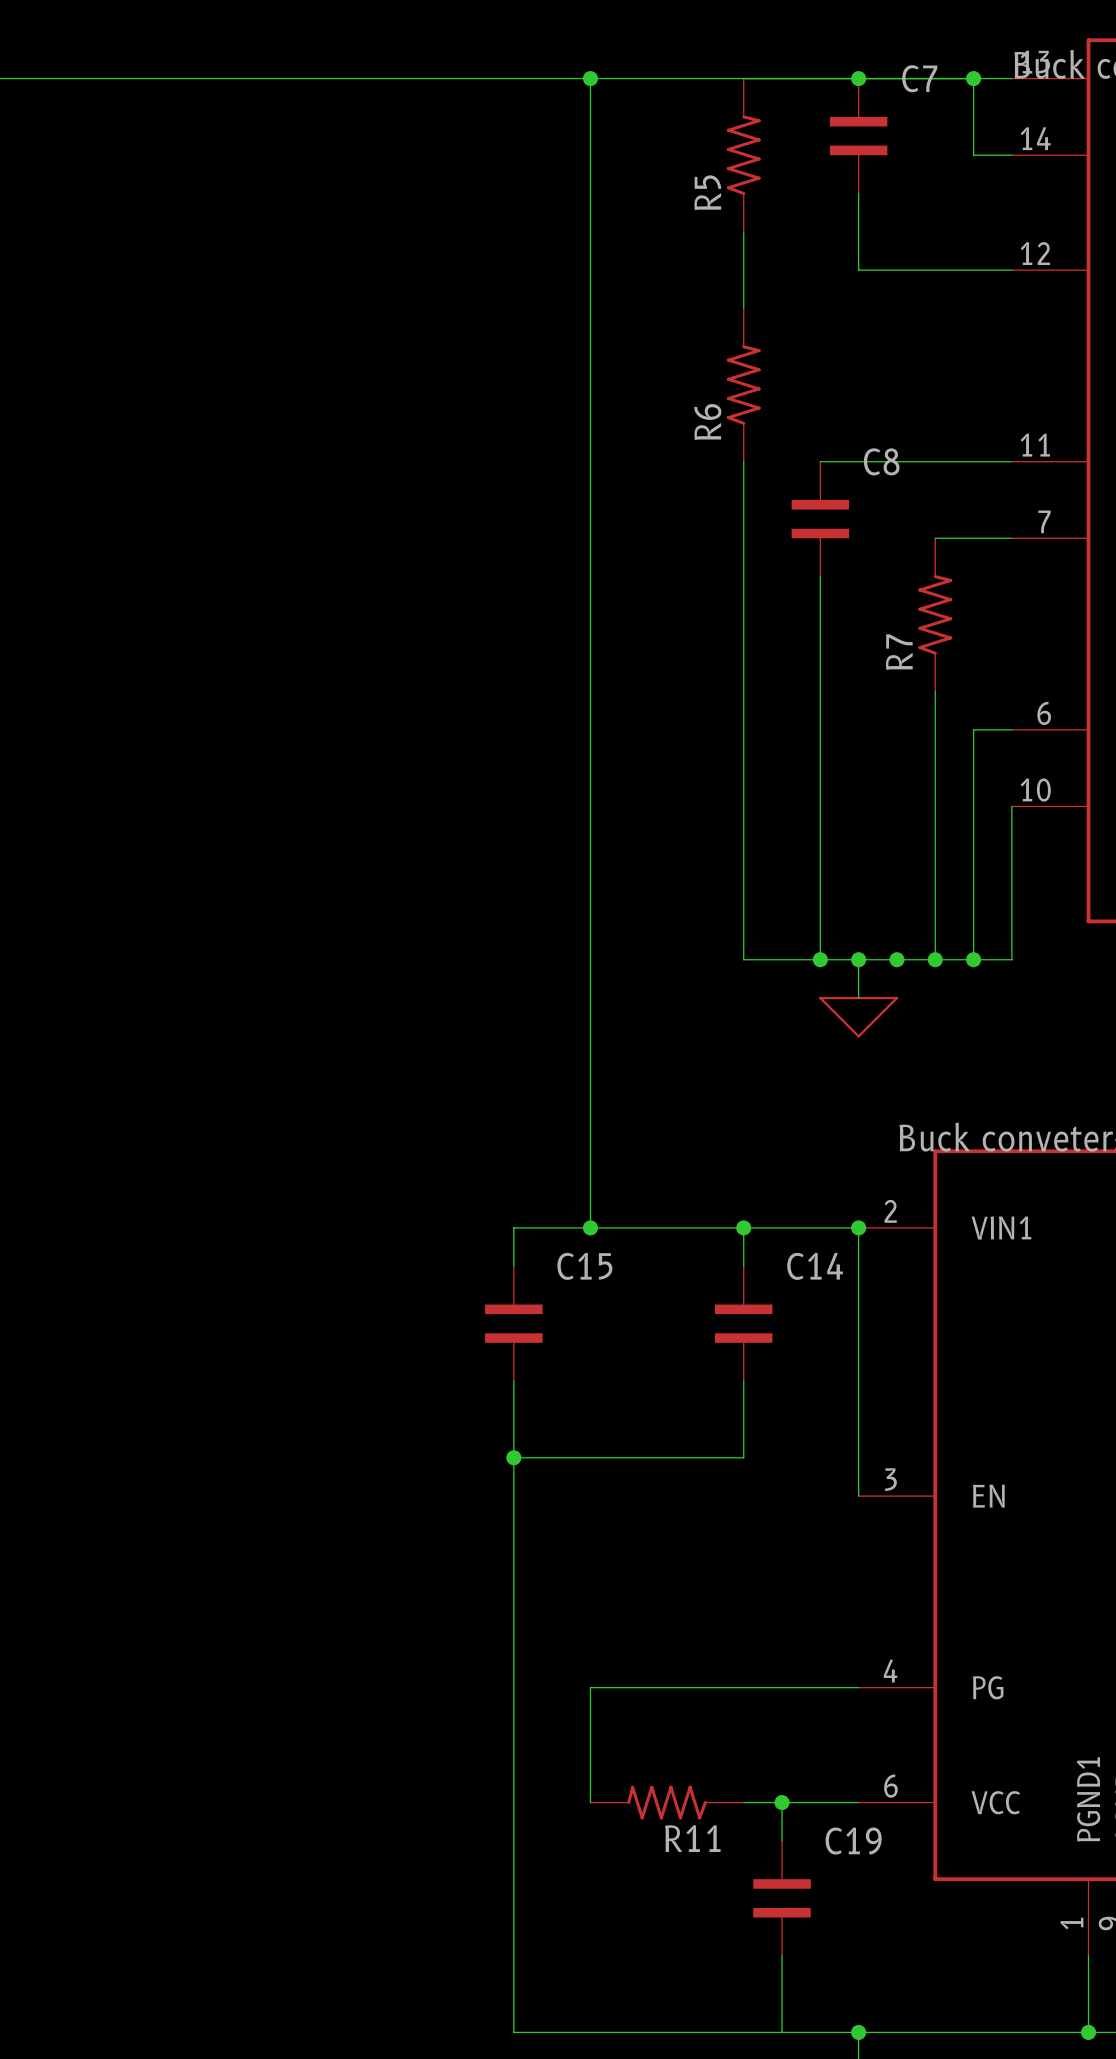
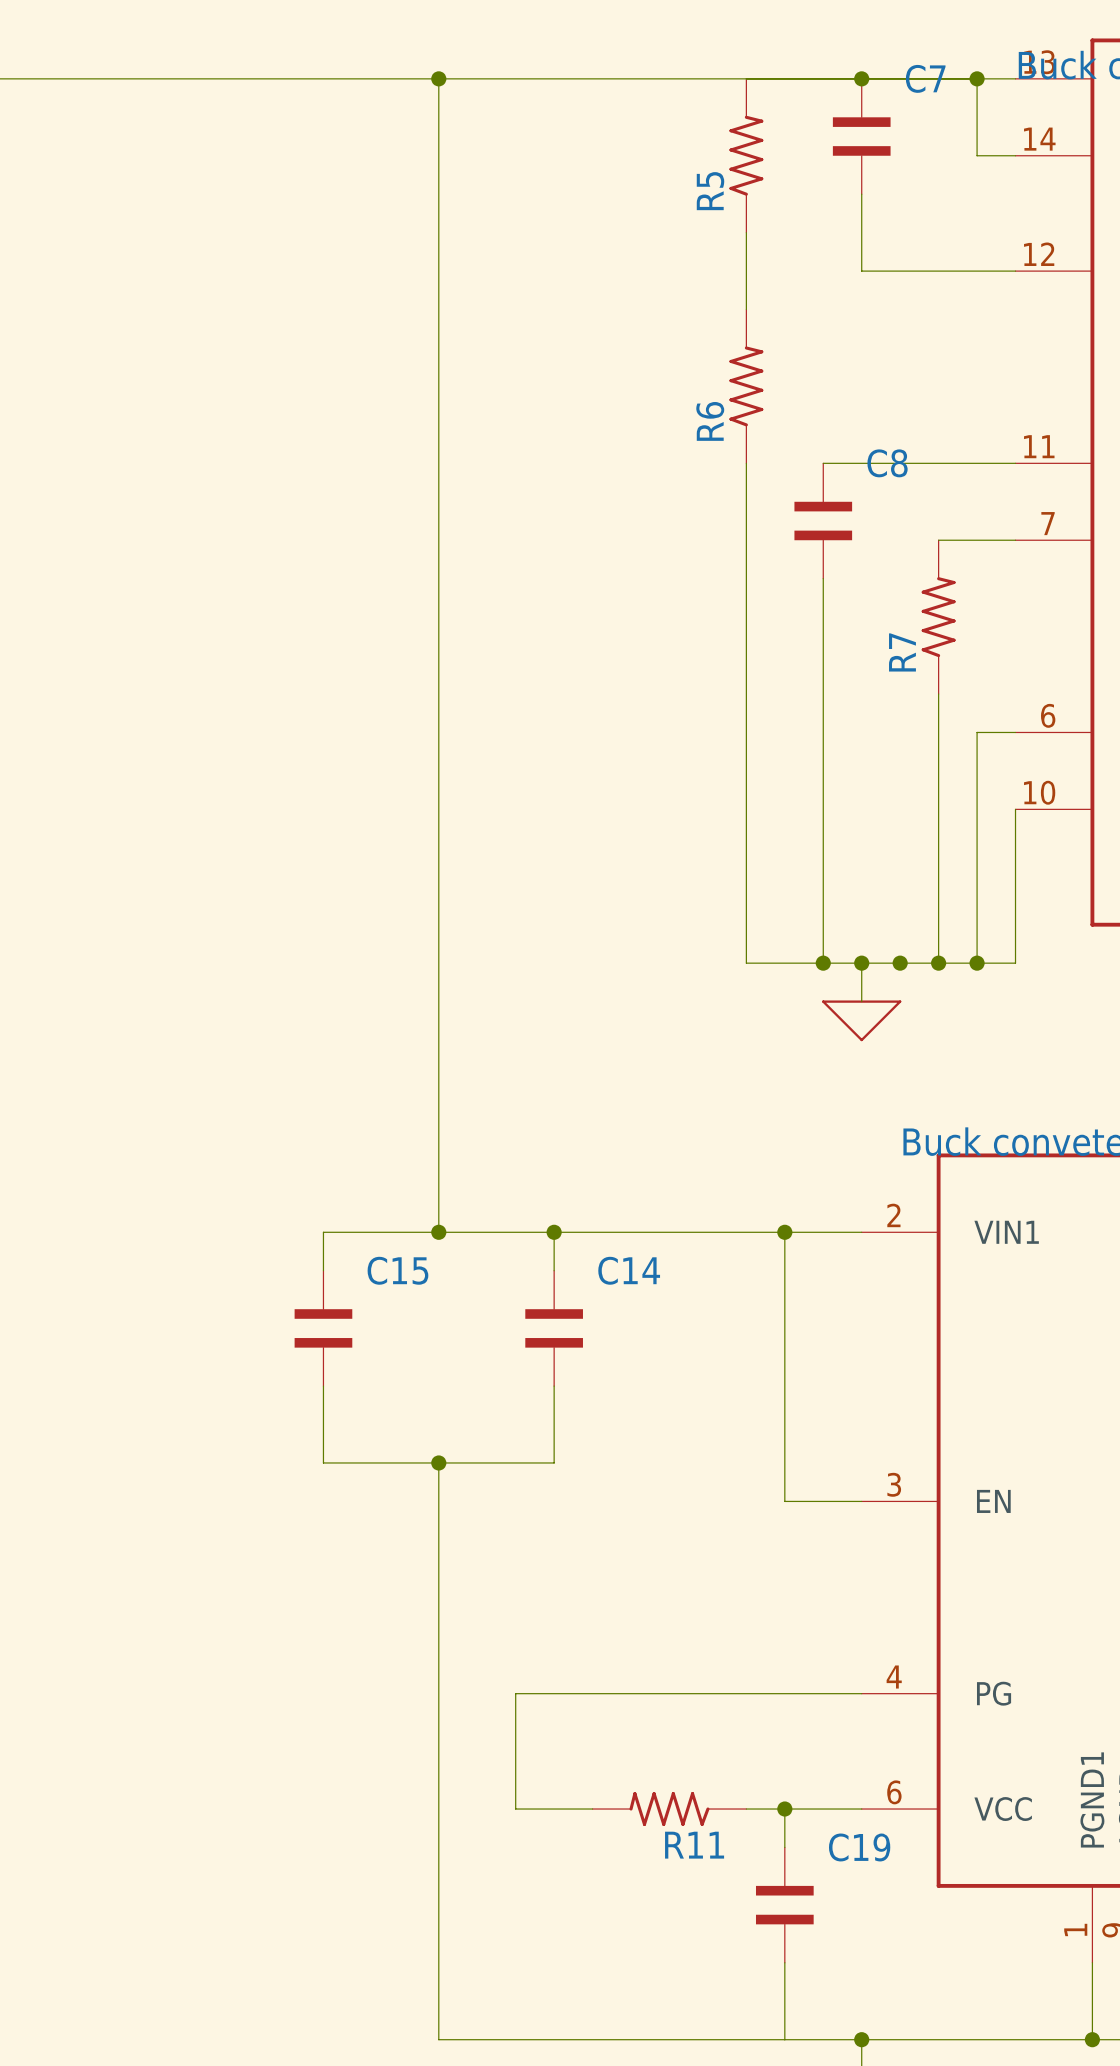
junction: none -> (438, 78)
wire: (590, 78) (590, 1227) -> (438, 78) (438, 1232)
junction: (590, 78) -> none
junction: none -> (438, 1232)
wire: (513, 1227) (513, 1266) -> (515, 1232) (323, 1232) (323, 1270)
junction position: (590, 1227) -> (554, 1232)
wire: (743, 1227) (743, 1266) -> (554, 1232) (554, 1270)
junction: (743, 1227) -> none
junction: none -> (784, 1232)
wire: (858, 1227) (858, 1496) -> (784, 1232) (784, 1501) (861, 1501)
junction: (858, 1227) -> none
C15 position: (513, 1323) -> (323, 1328)
C14 position: (743, 1323) -> (554, 1328)
wire: none -> (323, 1386) (323, 1462) (515, 1462)
wire: (513, 1381) (513, 1687) -> none
wire: (743, 1381) (743, 1457) (552, 1457) -> (554, 1386) (554, 1462)
wire: none -> (438, 1462) (438, 2039) (515, 2039)
junction position: (513, 1457) -> (438, 1462)
wire: (590, 1687) (590, 1802) -> (592, 1693) (515, 1693)
wire: (513, 1802) (513, 2032) -> (515, 1809) (592, 1809)

